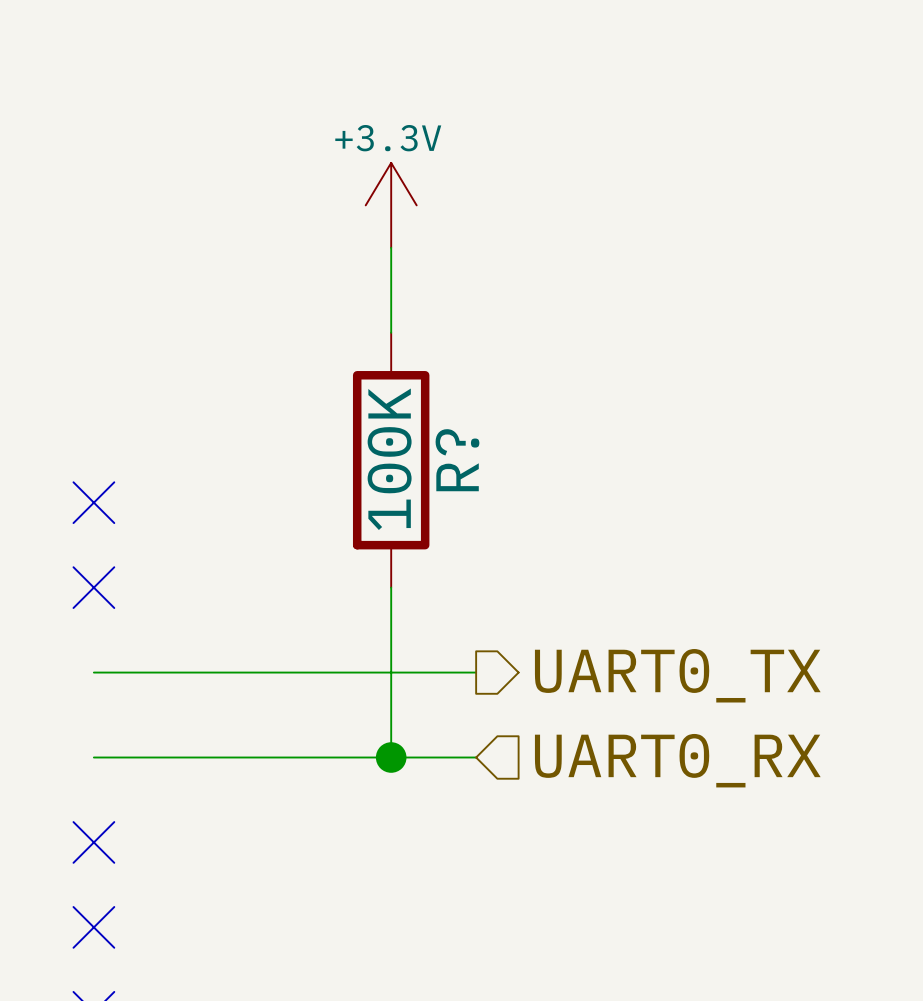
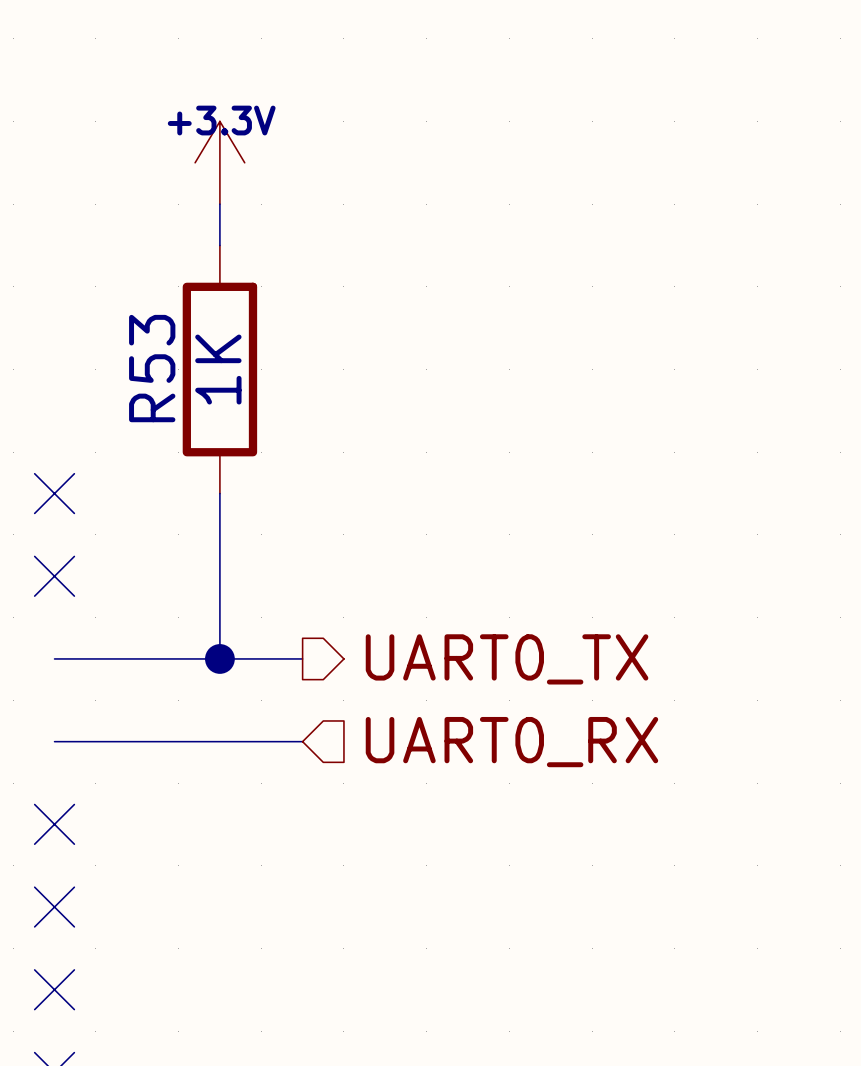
power symbol text position: +3.3V (388, 138) -> +3.3V (221, 120)
wire: none -> (219, 204) (219, 245)
power symbol position: +3.3V (391, 205) -> +3.3V (219, 162)
wire: (391, 247) (391, 332) -> none
R53: none -> 1K (219, 369)
R?: 100K (391, 460) -> none
wire: (391, 587) (391, 757) -> (219, 493) (219, 658)
wire: (348, 672) (476, 672) -> none
hierarchical label position: UART0_TX (677, 675) -> UART0_TX (507, 659)
wire: (348, 757) (476, 757) -> none
junction position: (391, 757) -> (219, 658)
hierarchical label position: UART0_RX (677, 760) -> UART0_RX (511, 742)

